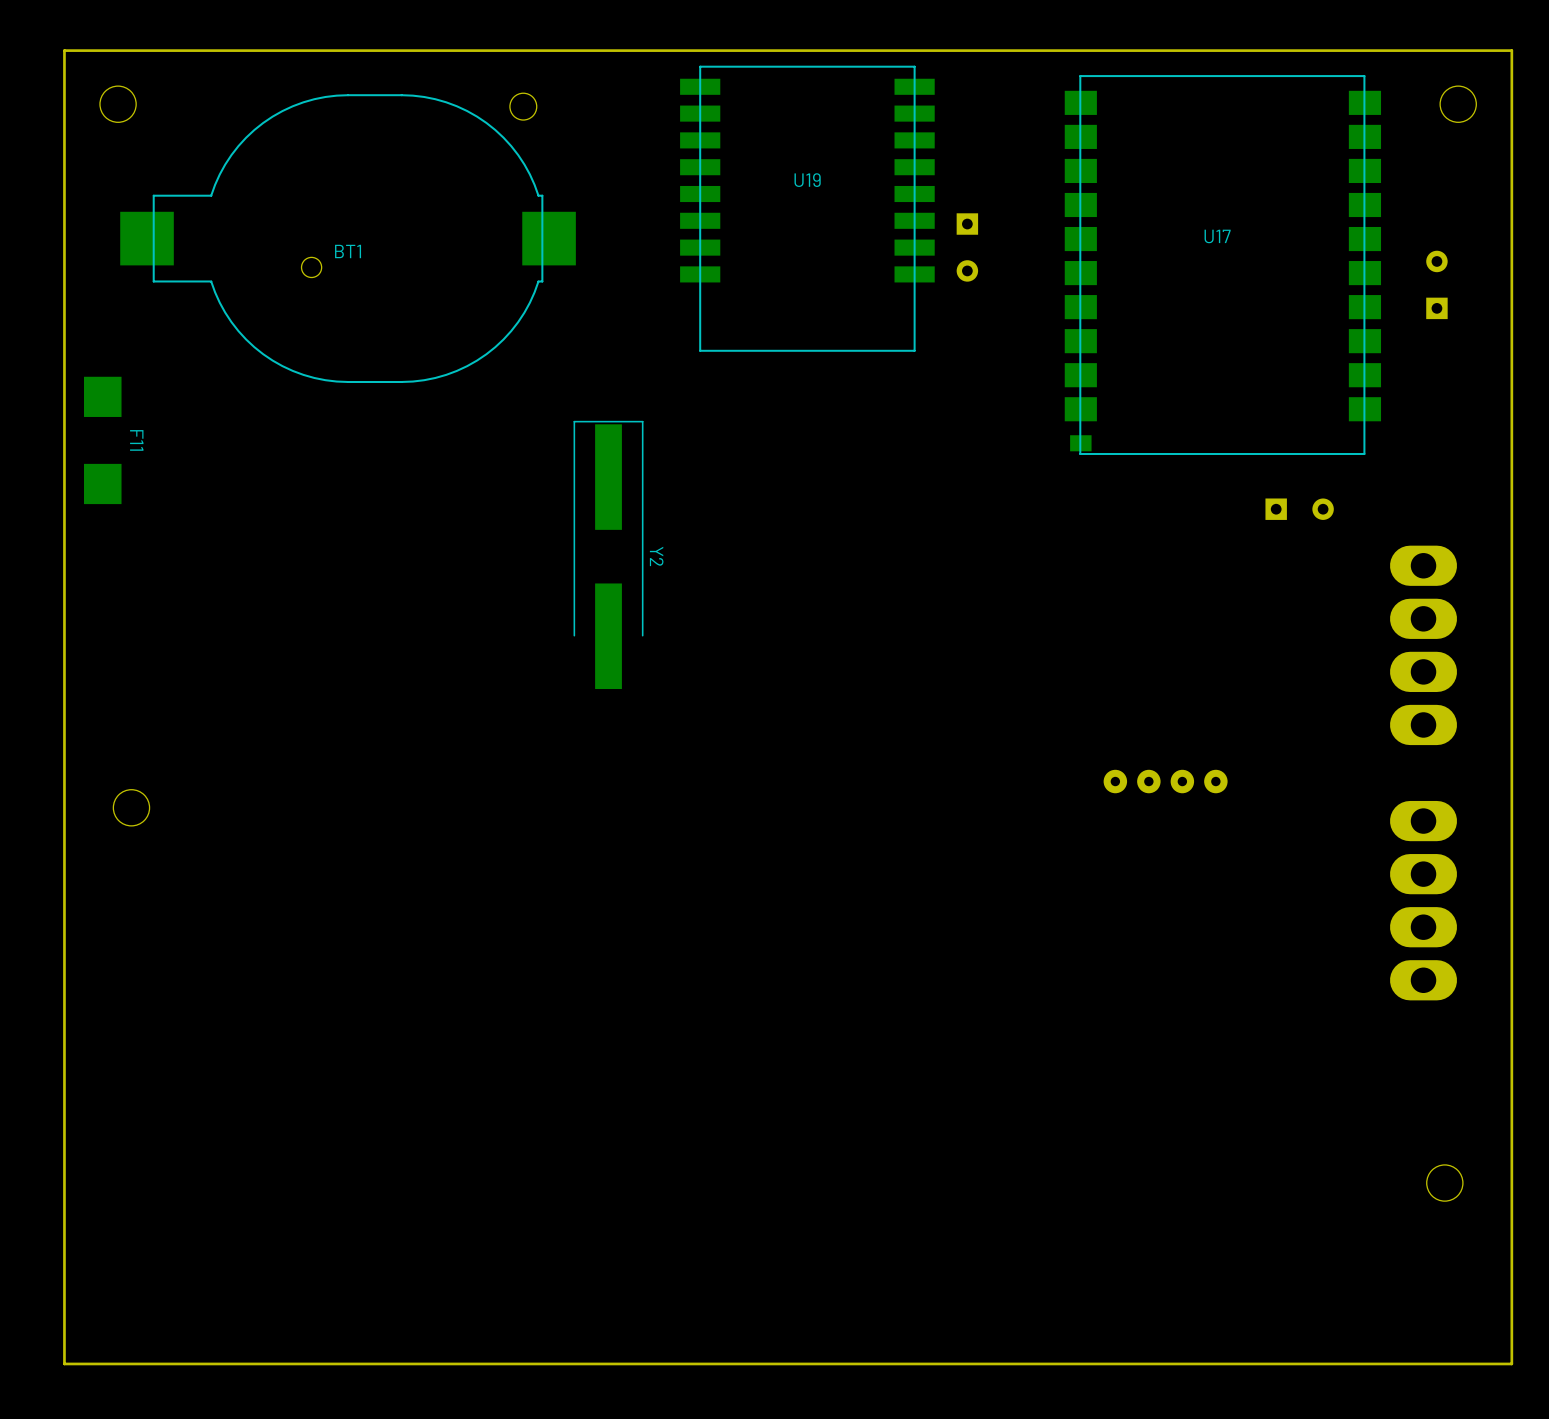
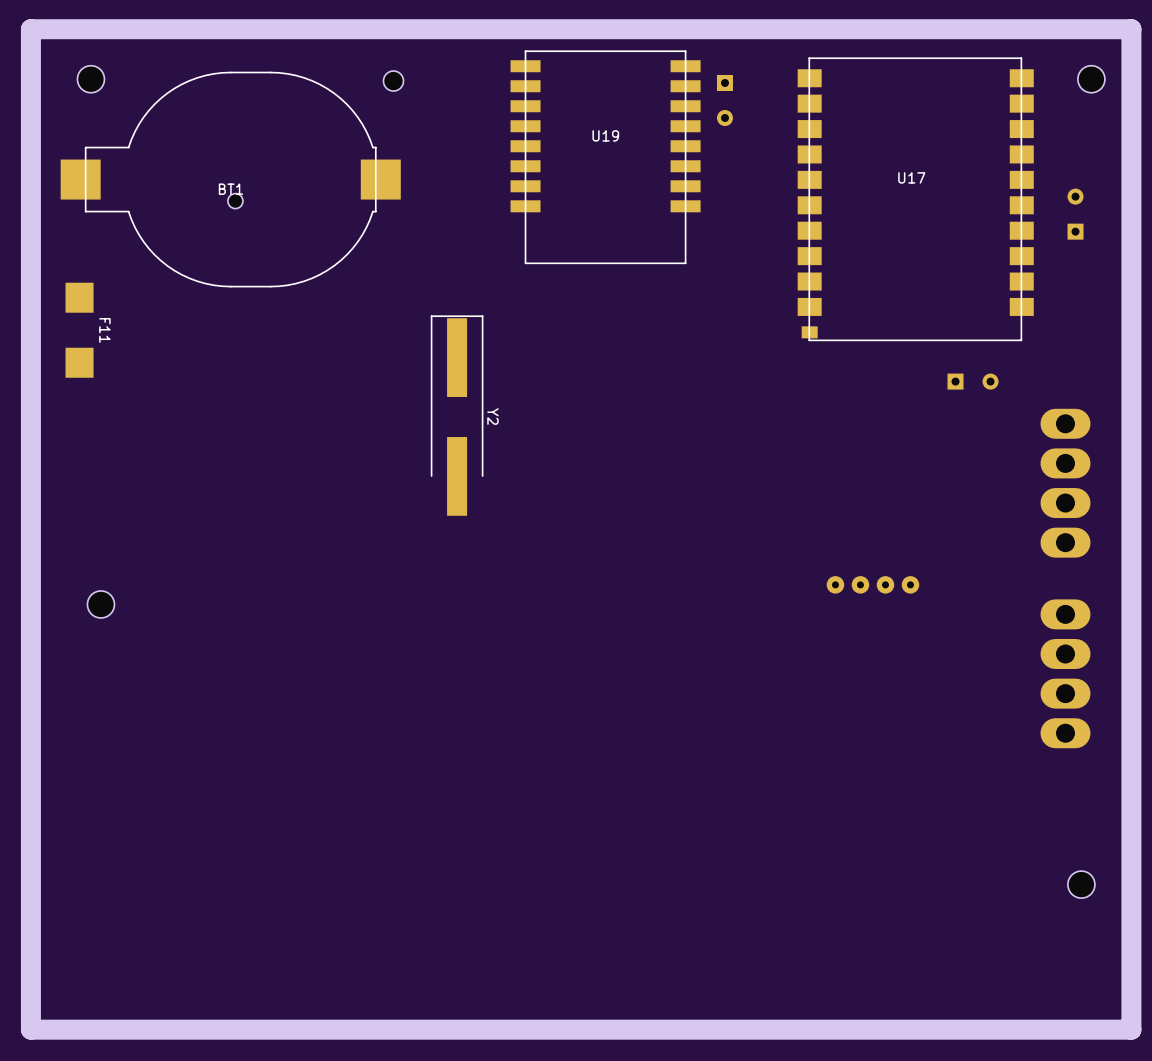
board edge: (1511, 50) (64, 50) (64, 1363) (1511, 1363) -> (1131, 39) (1131, 29) (30, 29) (30, 1029) (1131, 1029) (1131, 1019)
board edge width: thin (1511, 50) (1511, 1363) -> thick (1131, 39) (1131, 1019)
BT1 position: (348, 238) -> (230, 179)
part position: (967, 247) -> (724, 100)

